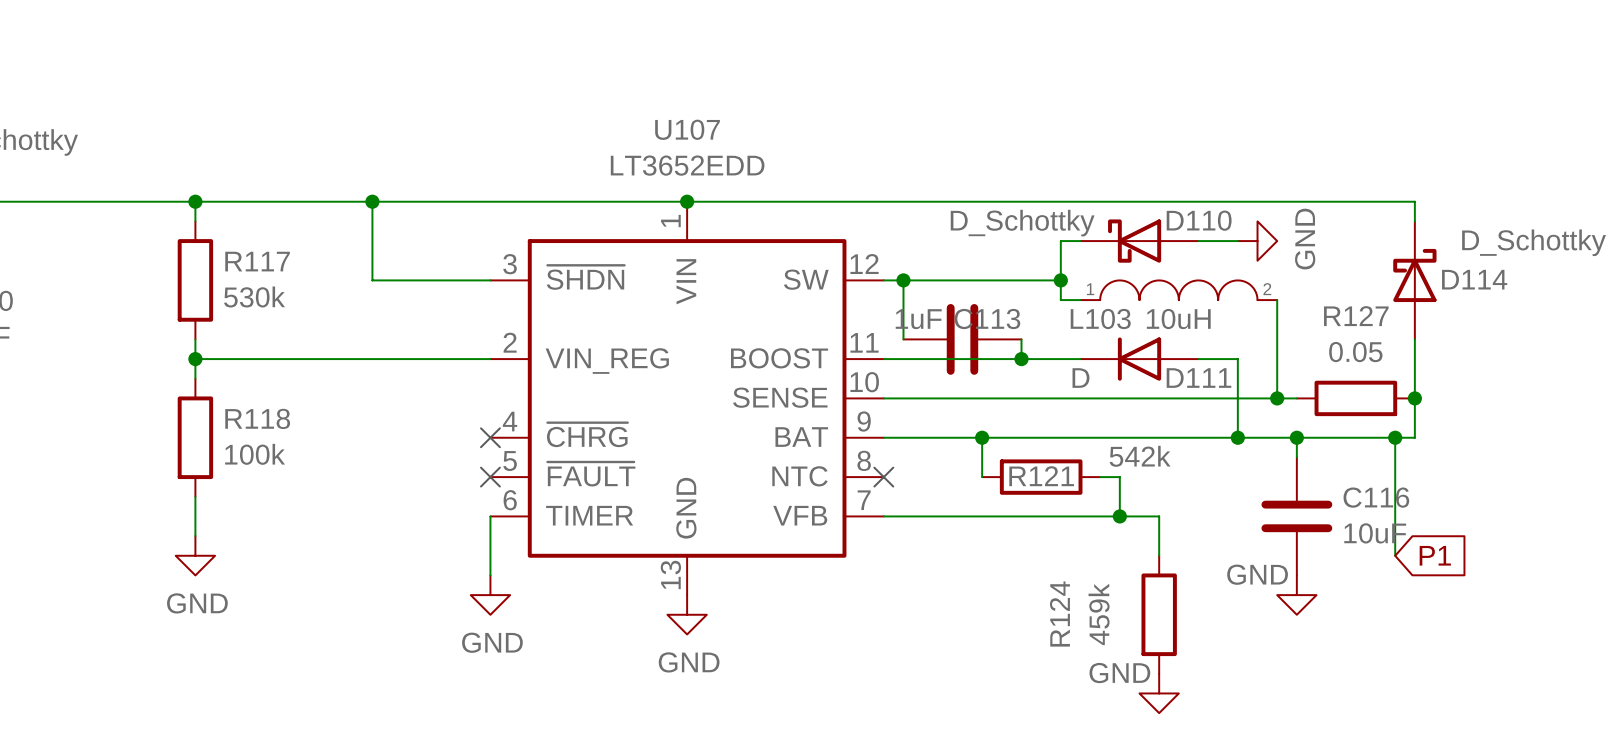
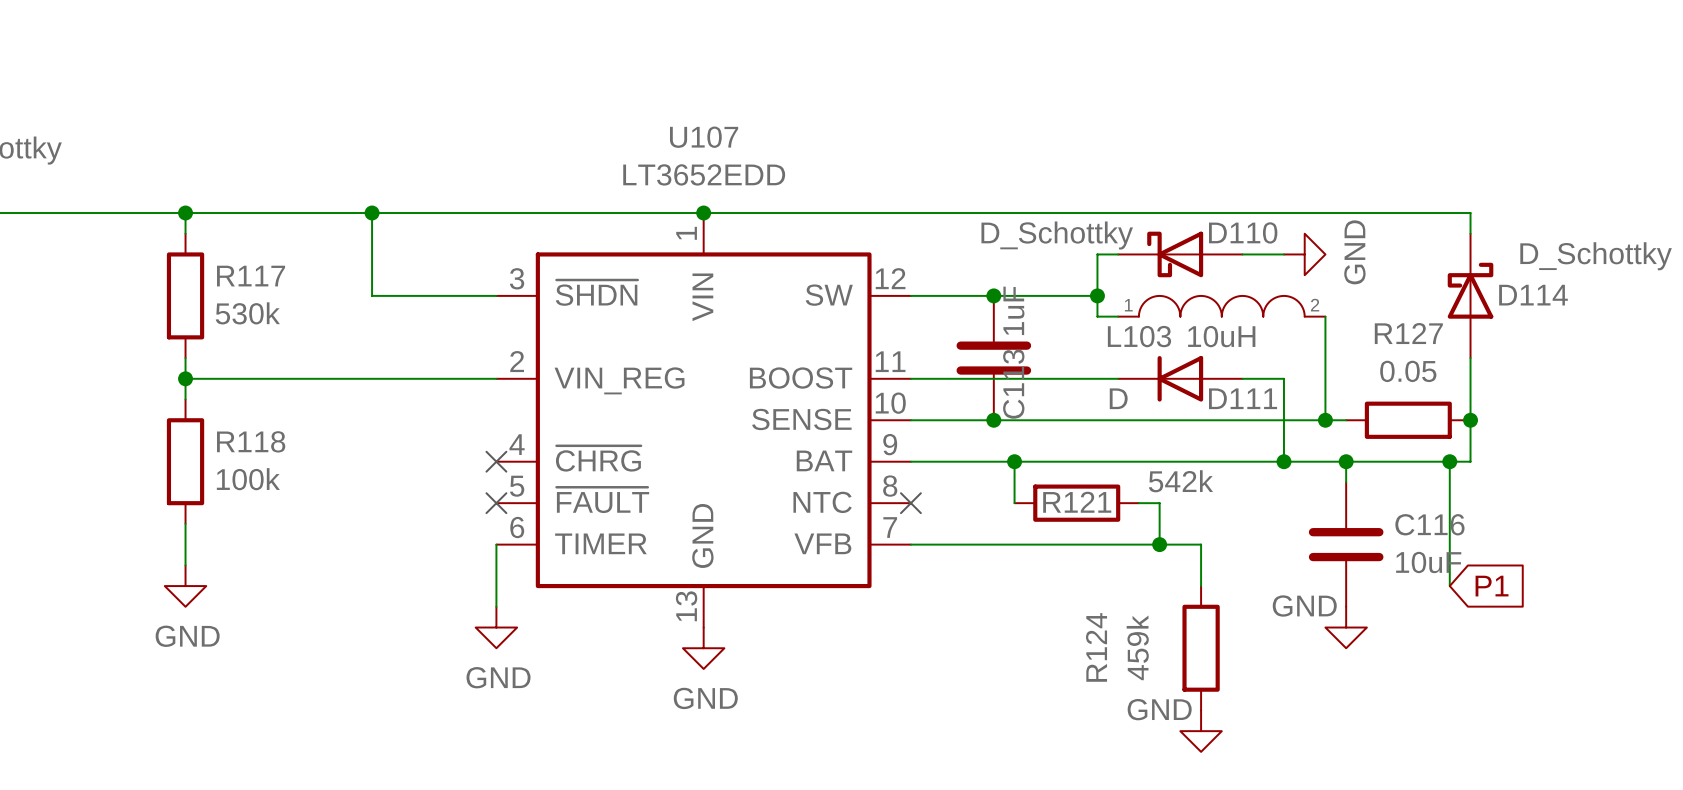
wire: (903, 280) (903, 339) -> none
junction: (903, 280) -> none
junction: none -> (993, 295)
C113 rotation: 0° (962, 339) -> 90° clockwise (993, 358)
wire: (1021, 339) (1021, 359) -> none
junction: (1021, 359) -> none
junction: none -> (993, 420)

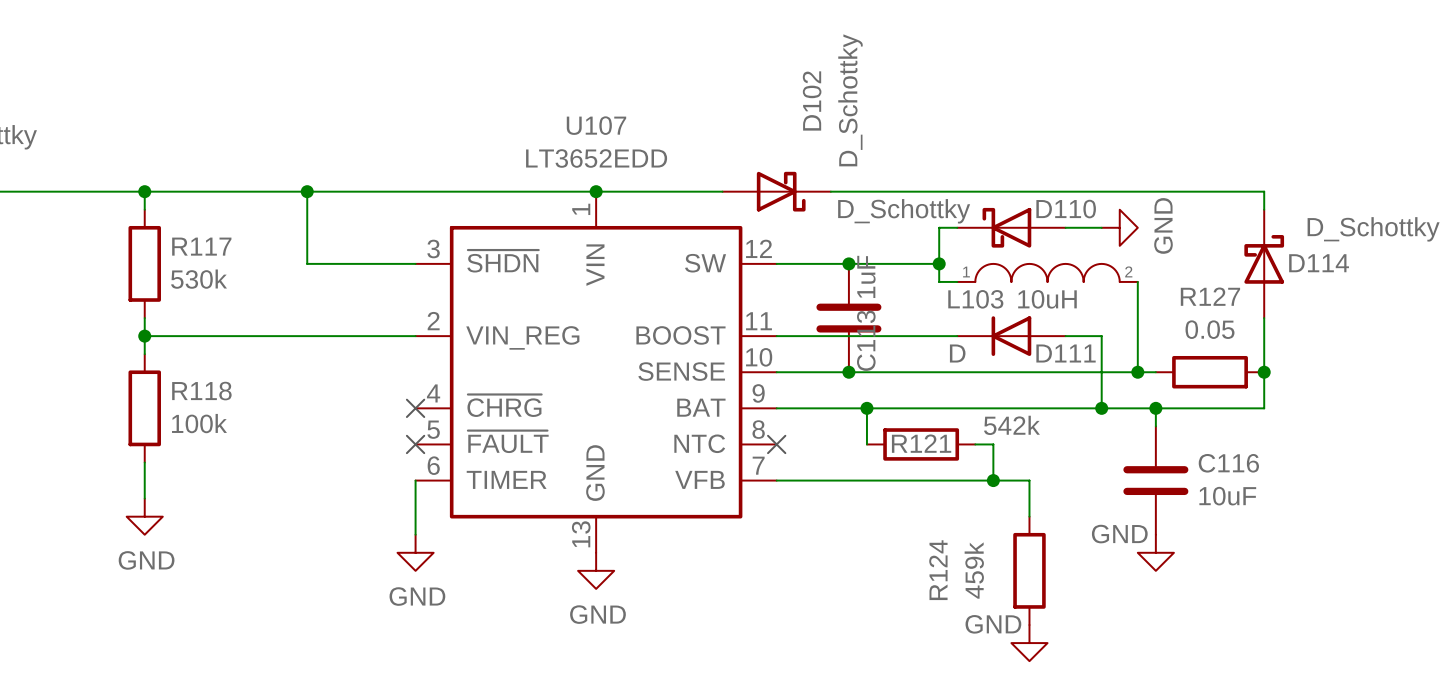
D102: none -> D_Schottky (776, 191)
wire: (1449, 461) (1449, 586) -> none
junction: (1449, 461) -> none
global label: P1 (1492, 586) -> none

